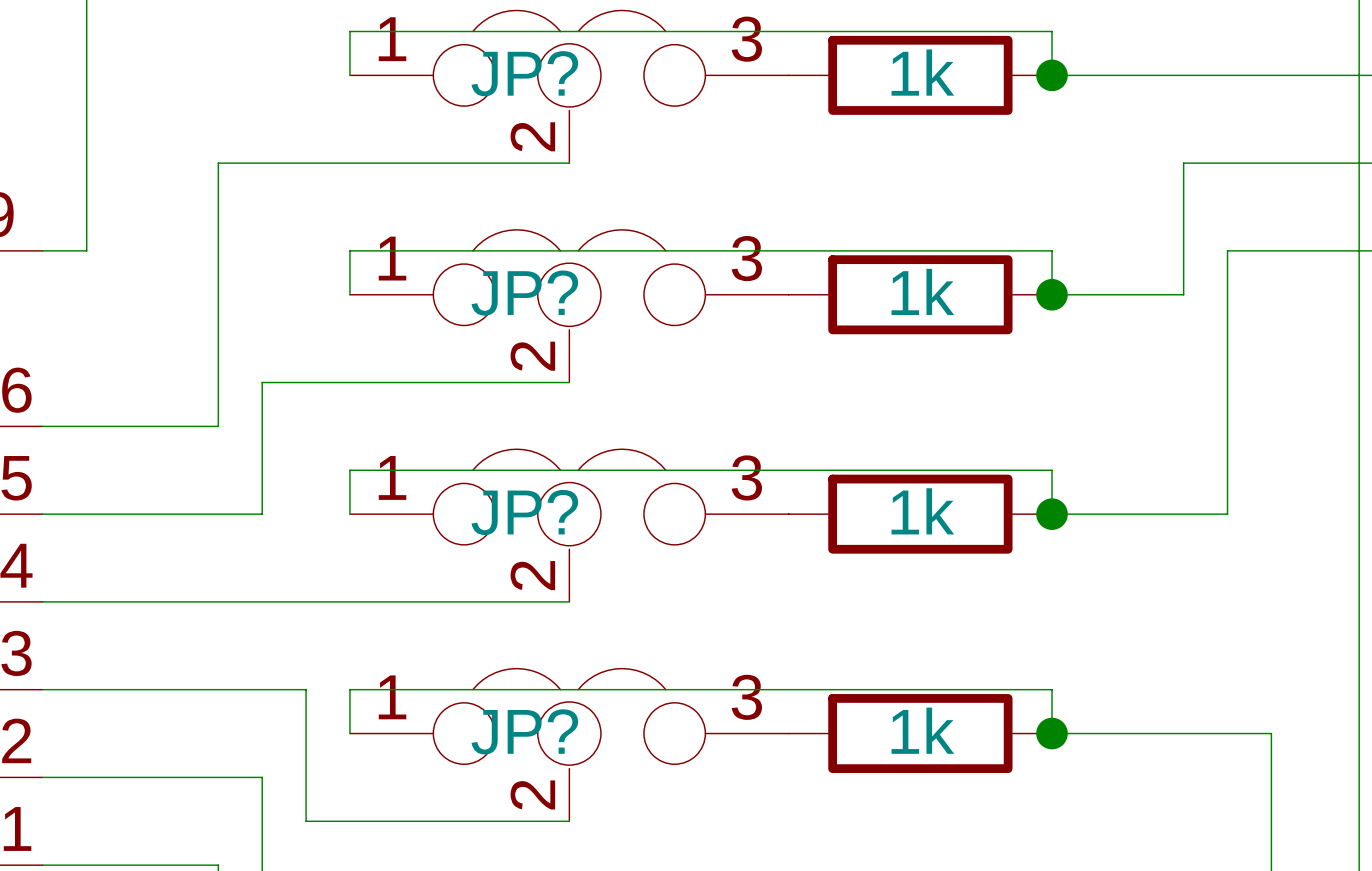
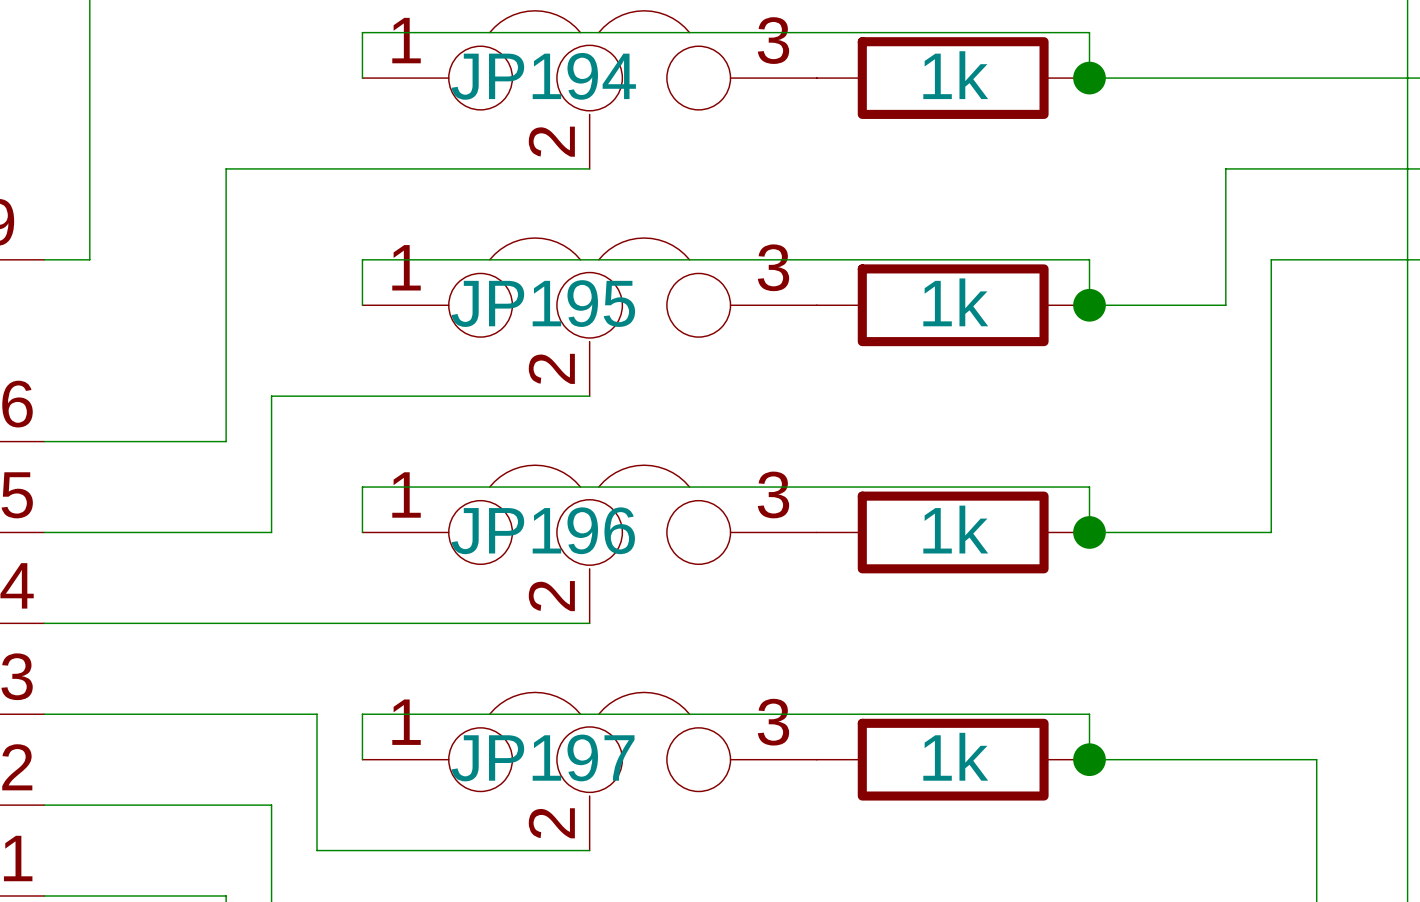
JP? name: JP? (524, 73) -> JP194 (543, 76)
JP? name: JP? (524, 293) -> JP195 (543, 303)
JP? name: JP? (524, 512) -> JP196 (543, 530)
JP? name: JP? (524, 731) -> JP197 (543, 757)

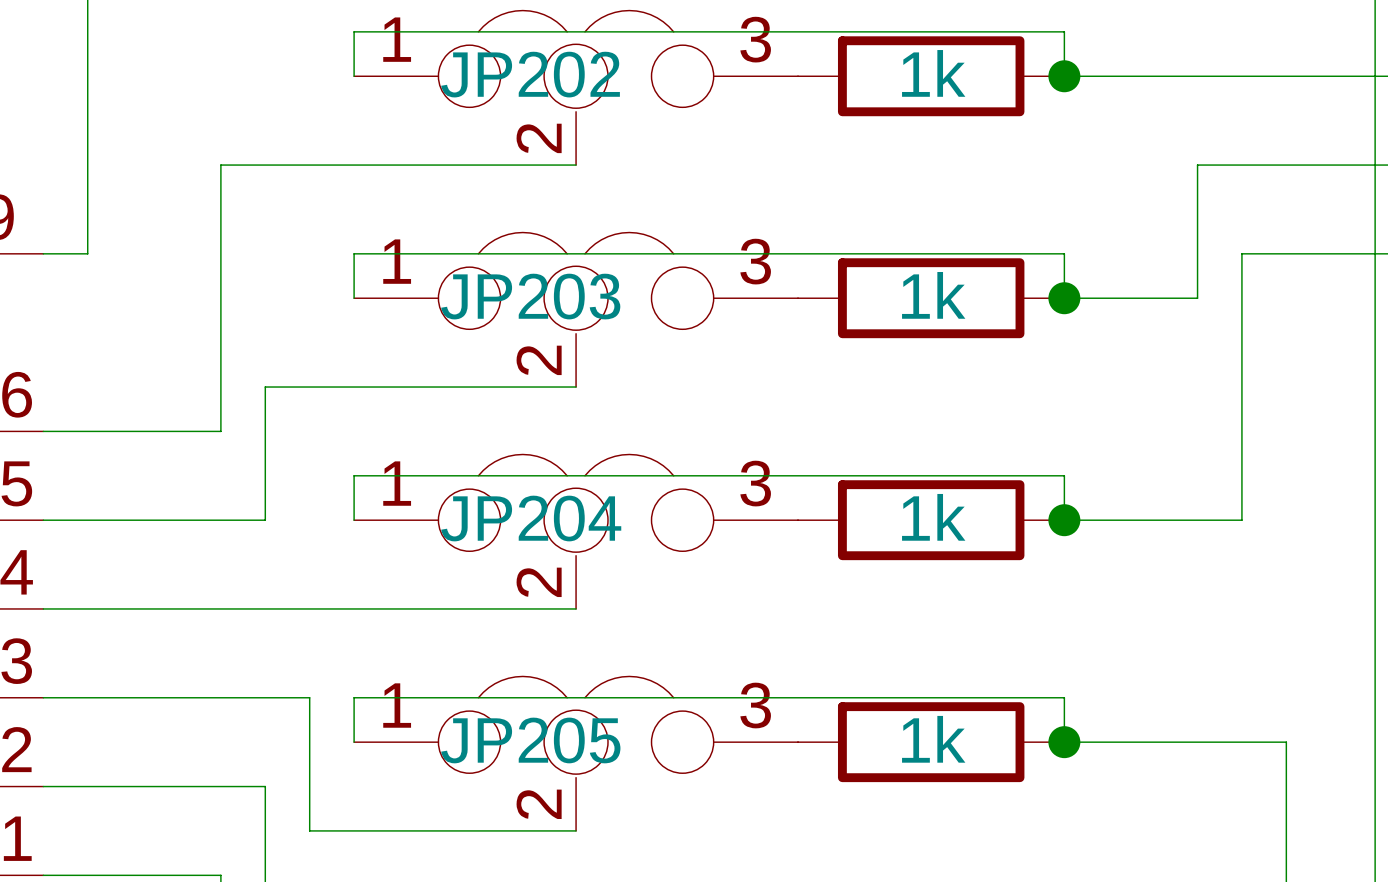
JP194 name: JP194 (543, 76) -> JP202 (530, 74)
JP195 name: JP195 (543, 303) -> JP203 (530, 296)
JP196 name: JP196 (543, 530) -> JP204 (531, 518)
JP197 name: JP197 (543, 757) -> JP205 (530, 740)

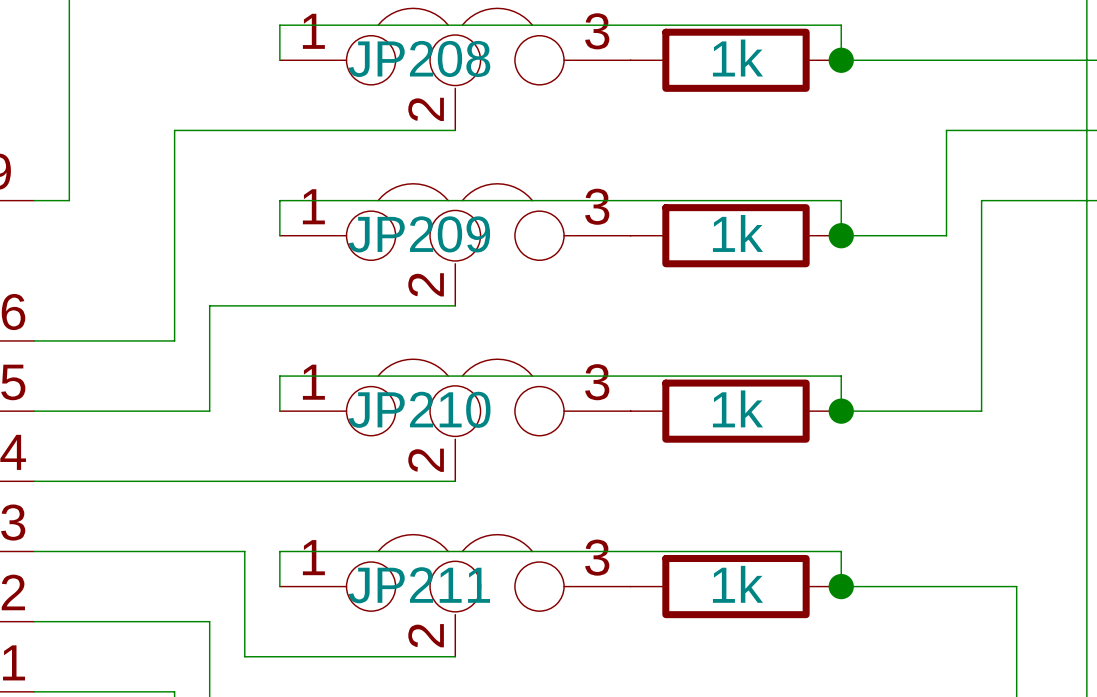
JP202 name: JP202 (530, 74) -> JP208 (419, 58)
JP203 name: JP203 (530, 296) -> JP209 (419, 234)
JP204 name: JP204 (531, 518) -> JP210 (419, 409)
JP205 name: JP205 (530, 740) -> JP211 (419, 585)

